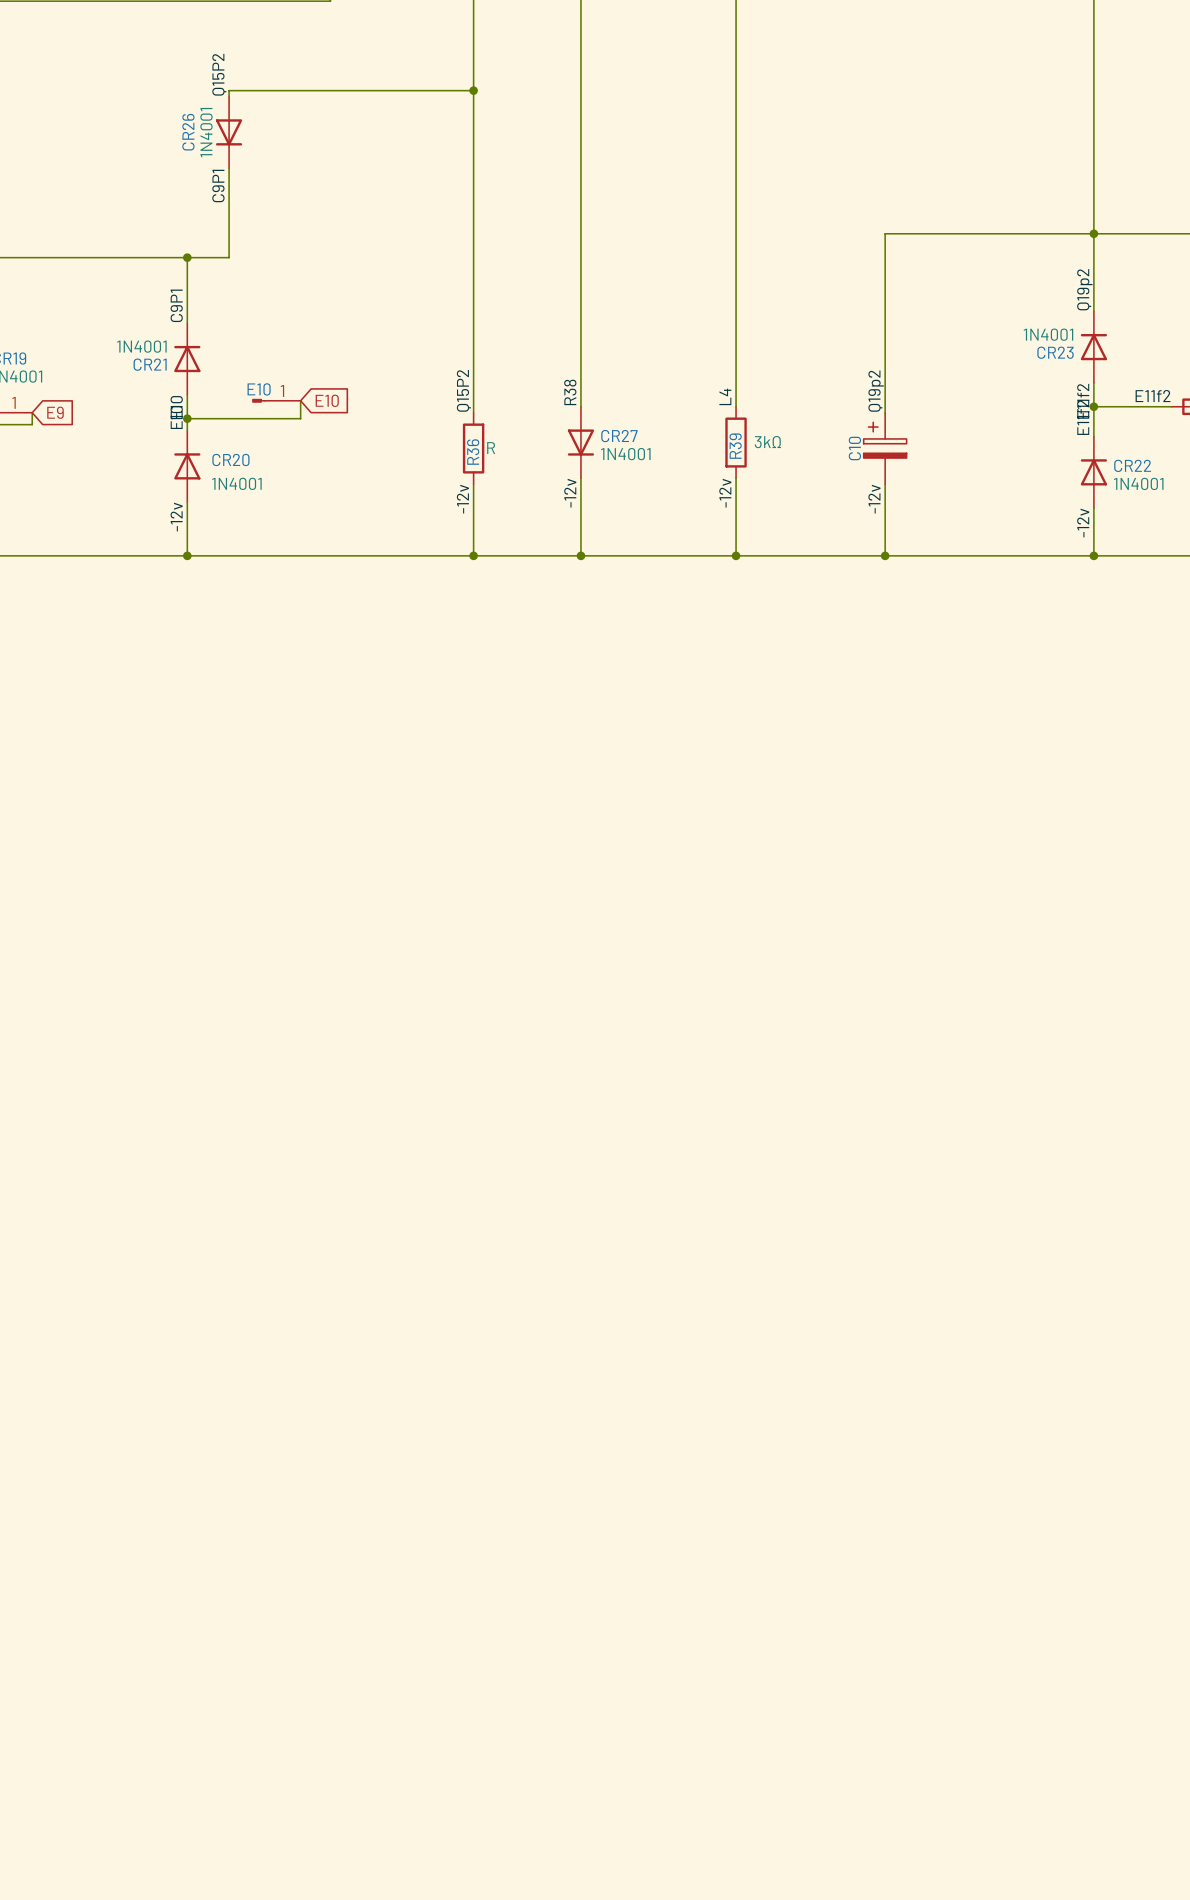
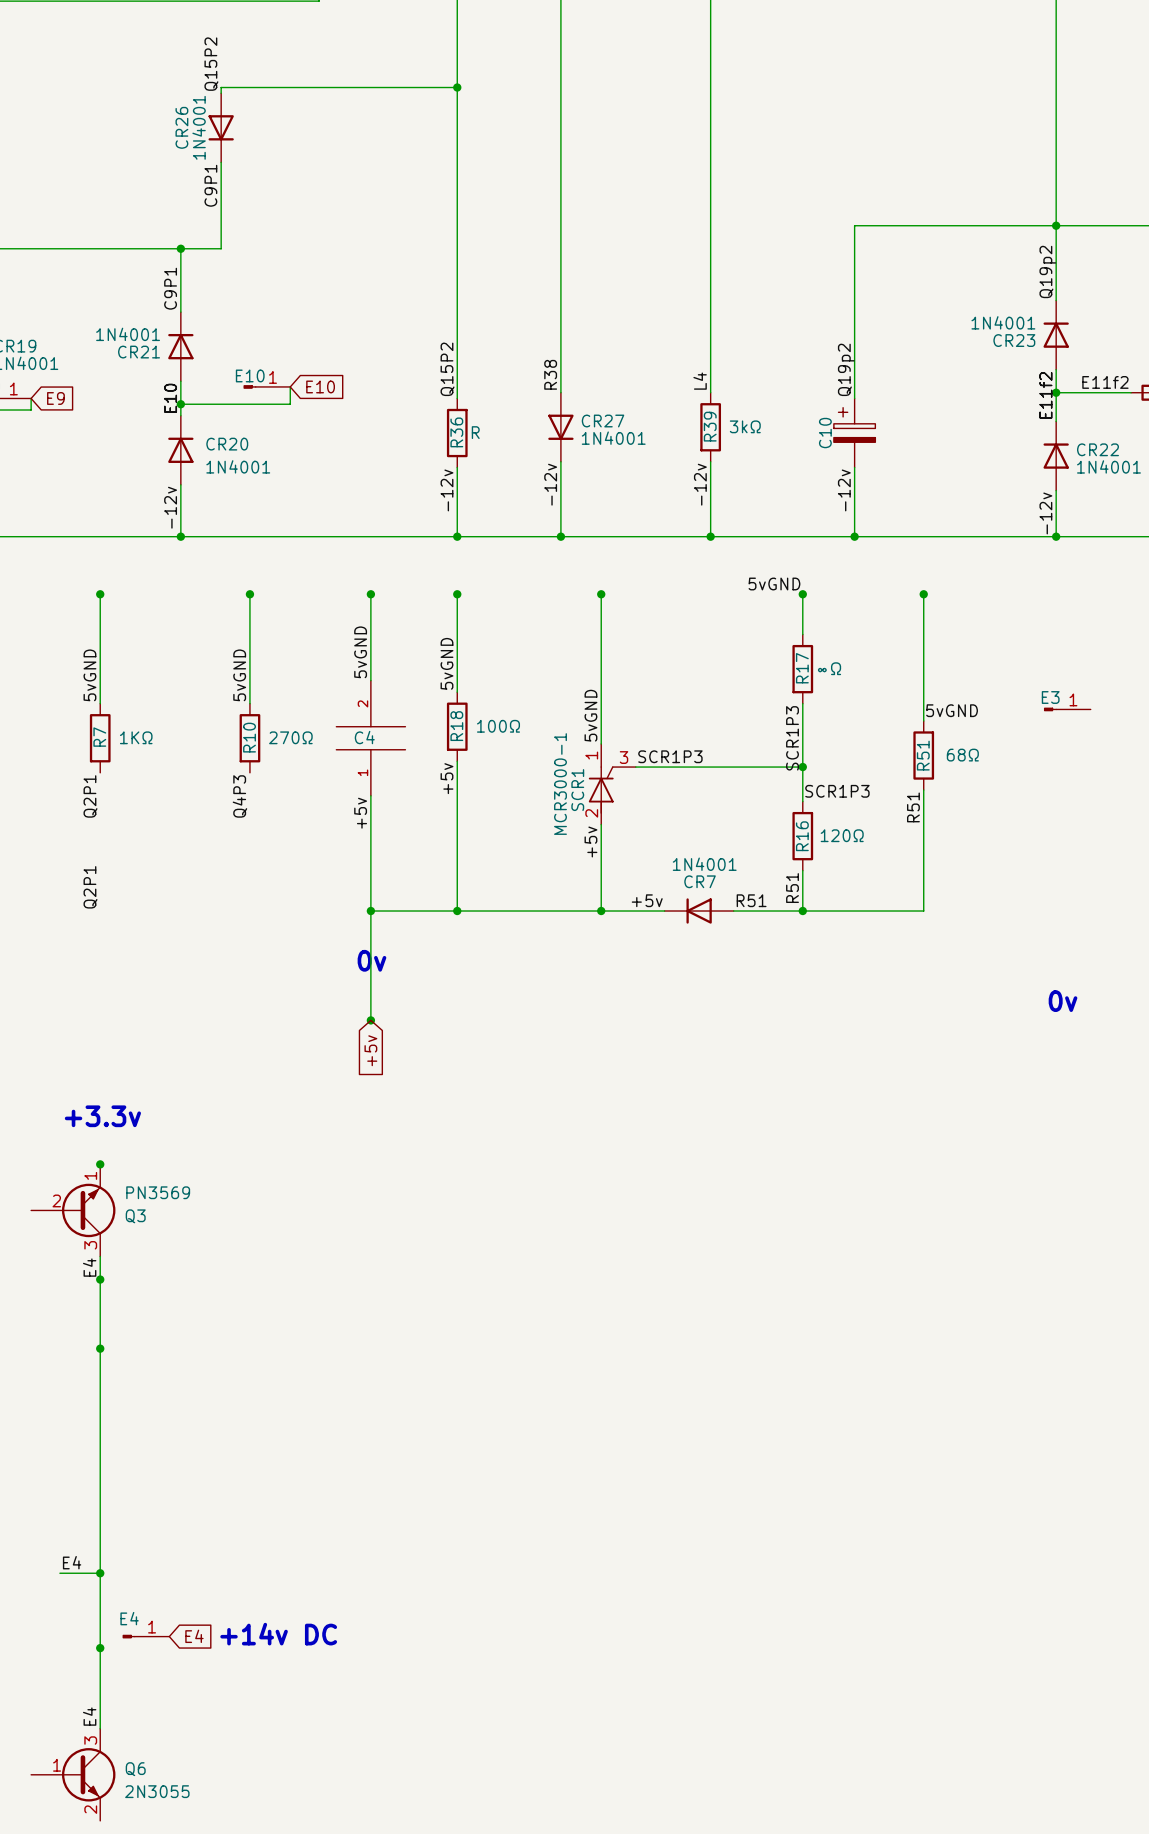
label: none -> 5vGND (774, 584)
wire: none -> (100, 594) (100, 703)
junction: none -> (100, 594)
wire: none -> (249, 594) (249, 703)
junction: none -> (249, 594)
wire: none -> (370, 594) (370, 680)
junction: none -> (370, 594)
wire: none -> (457, 594) (457, 692)
junction: none -> (457, 594)
wire: none -> (601, 594) (601, 744)
junction: none -> (601, 594)
wire: none -> (802, 594) (802, 634)
junction: none -> (802, 594)
wire: none -> (923, 594) (923, 720)
junction: none -> (923, 594)
label: none -> 5vGND (360, 652)
label: none -> 5vGND (446, 663)
R17: none -> ∞Ω (802, 669)
label: none -> 5vGND (89, 675)
label: none -> 5vGND (239, 675)
wire: none -> (802, 703) (802, 801)
E3: none -> (1067, 709)
label: none -> 5vGND (952, 710)
label: none -> 5vGND (590, 715)
R18: none -> 100Ω (457, 726)
label: none -> SCR1P3 (792, 738)
R7: none -> 1KΩ (100, 738)
R10: none -> 270Ω (249, 738)
C4: none -> (370, 738)
R51: none -> 68Ω (923, 755)
label: none -> SCR1P3 (670, 756)
wire: none -> (457, 761) (457, 911)
wire: none -> (635, 767) (802, 767)
junction: none -> (802, 767)
label: none -> +5v (446, 778)
SCR1: none -> MCR3000-1 (612, 784)
label: none -> Q2P1 (90, 796)
wire: none -> (923, 790) (923, 911) (733, 911)
label: none -> Q4P3 (239, 796)
label: none -> SCR1P3 (837, 791)
wire: none -> (370, 795) (370, 1020)
label: none -> R51 (913, 807)
label: none -> +5v (360, 813)
wire: none -> (601, 824) (601, 911)
label: none -> +5v (590, 841)
R16: none -> 120Ω (802, 836)
wire: none -> (802, 870) (802, 911)
label: none -> R51 (792, 888)
label: none -> Q2P1 (90, 887)
label: none -> +5v (647, 900)
label: none -> R51 (751, 900)
wire: none -> (370, 911) (664, 911)
junction: none -> (370, 911)
junction: none -> (457, 911)
junction: none -> (601, 911)
CR7: none -> 1N4001 (699, 911)
junction: none -> (802, 911)
text: none -> 0v (371, 960)
text: none -> 0v (1063, 1001)
junction: none -> (370, 1020)
global label: none -> +5v (370, 1050)
text: none -> +3.3v (102, 1116)
junction: none -> (100, 1164)
Q3: none -> PN3569 (73, 1210)
wire: none -> (100, 1256) (100, 1728)
label: none -> E4 (89, 1267)
junction: none -> (100, 1279)
junction: none -> (100, 1348)
label: none -> E4 (72, 1562)
wire: none -> (59, 1573) (100, 1573)
junction: none -> (100, 1573)
text: none -> +14v DC (278, 1634)
E4: none -> (145, 1636)
global label: none -> E4 (194, 1636)
junction: none -> (100, 1648)
label: none -> E4 (89, 1716)
Q6: none -> 2N3055 (73, 1774)

